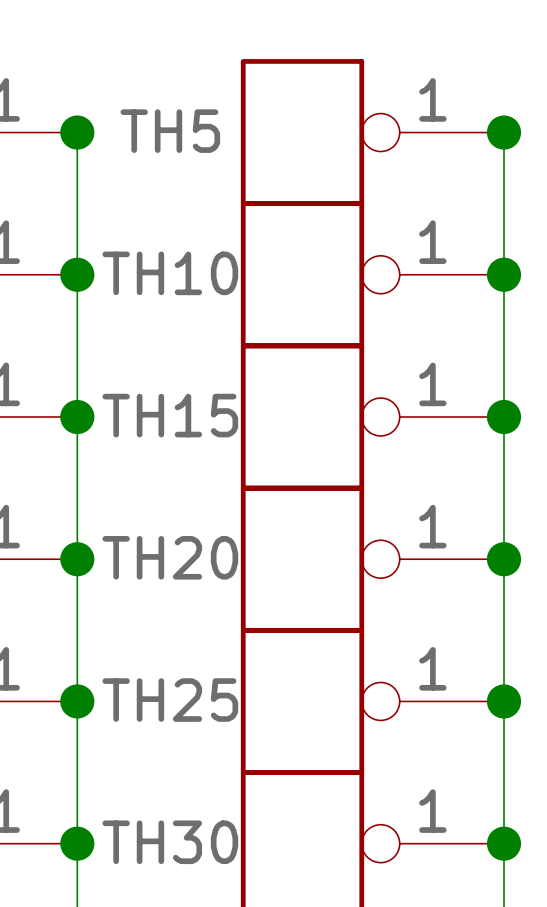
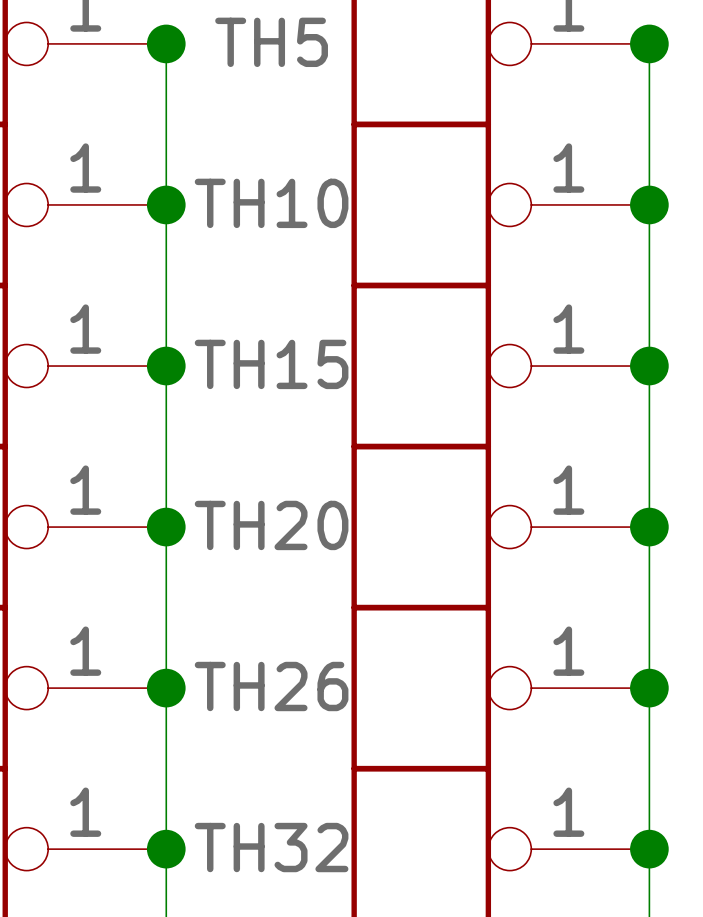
TH25 name: TH25 (170, 700) -> TH26 (271, 686)
TH30 name: TH30 (170, 842) -> TH32 (271, 847)

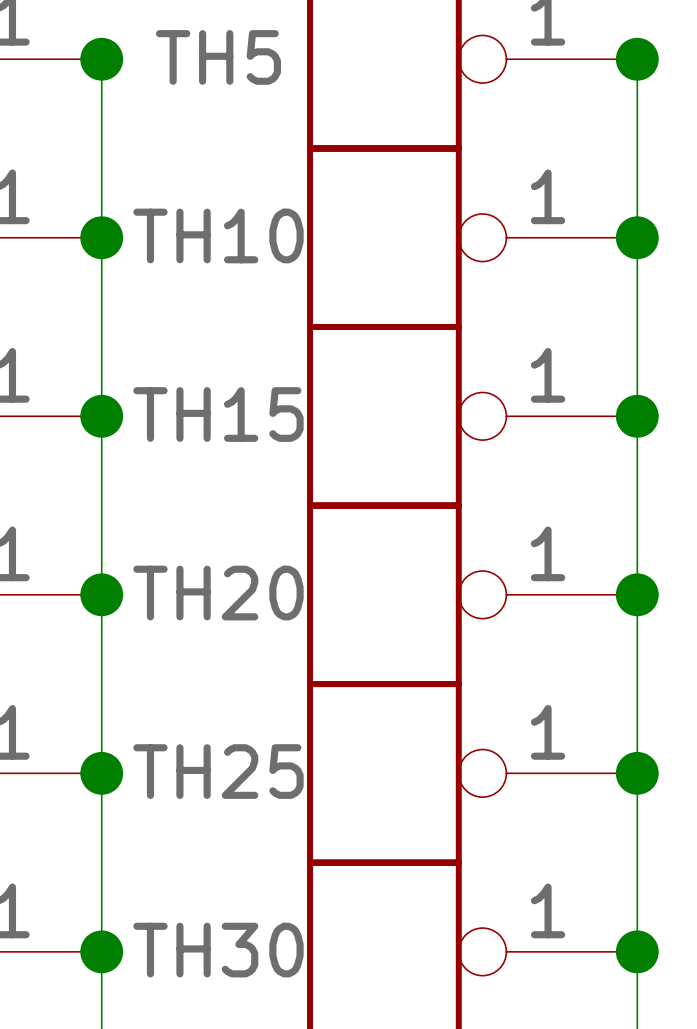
TH26 name: TH26 (271, 686) -> TH25 (218, 771)
TH32 name: TH32 (271, 847) -> TH30 (218, 950)

